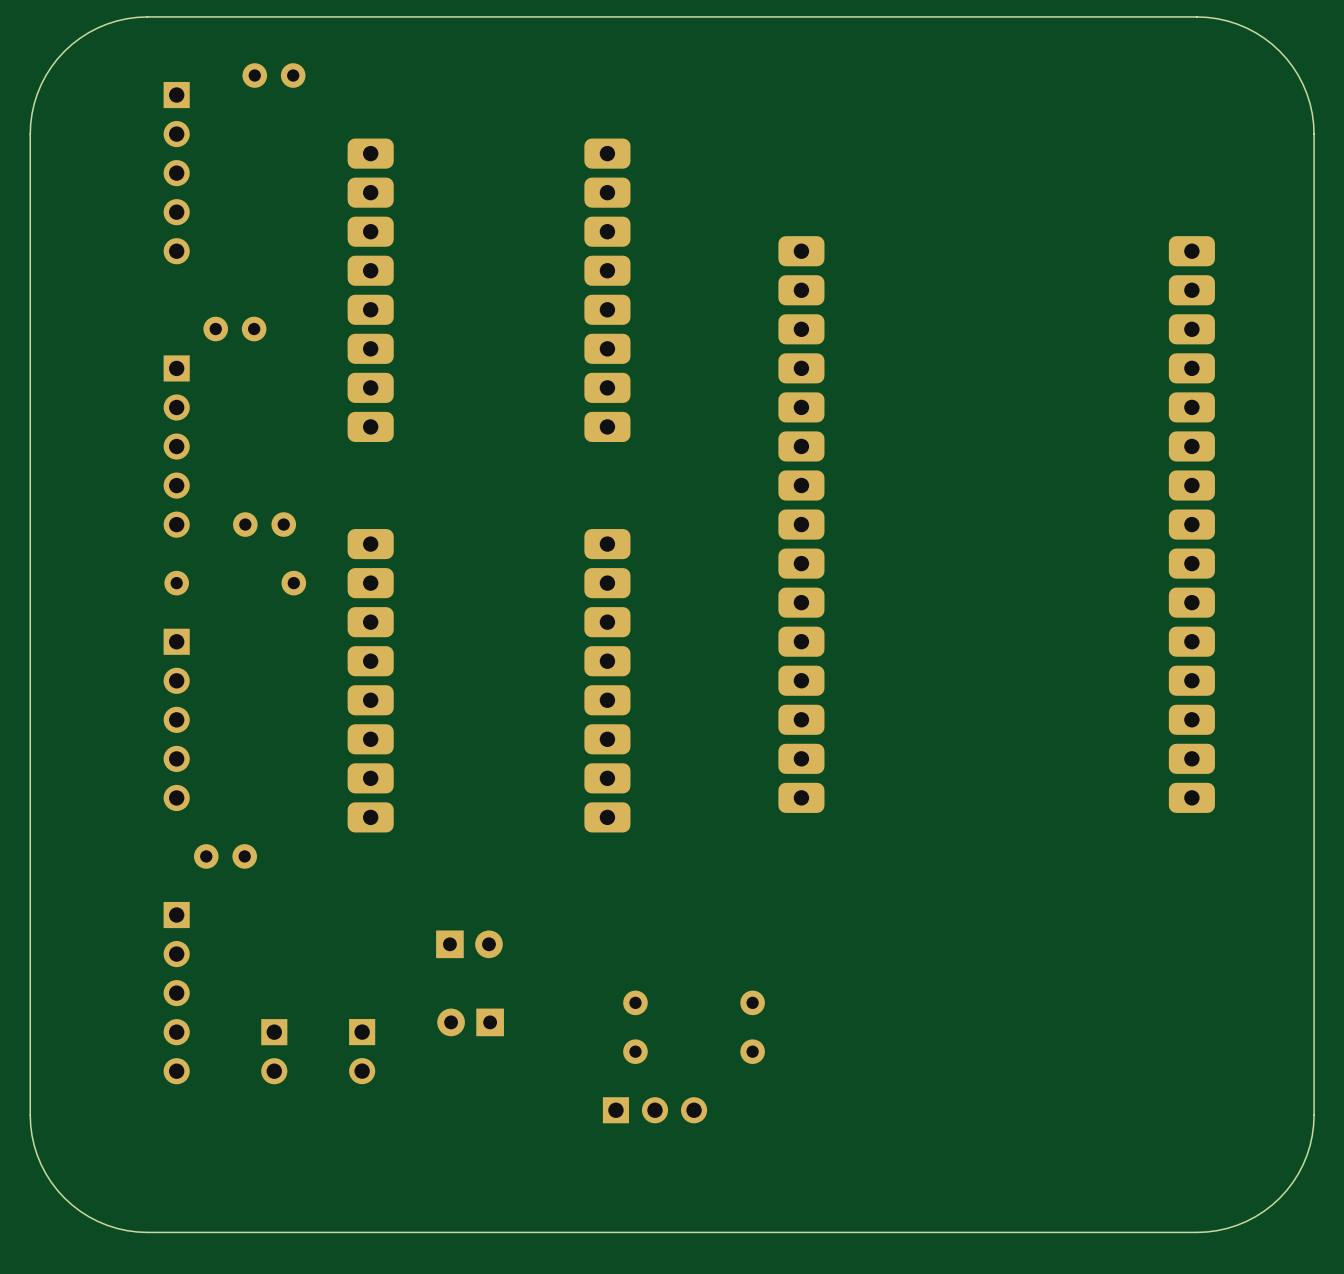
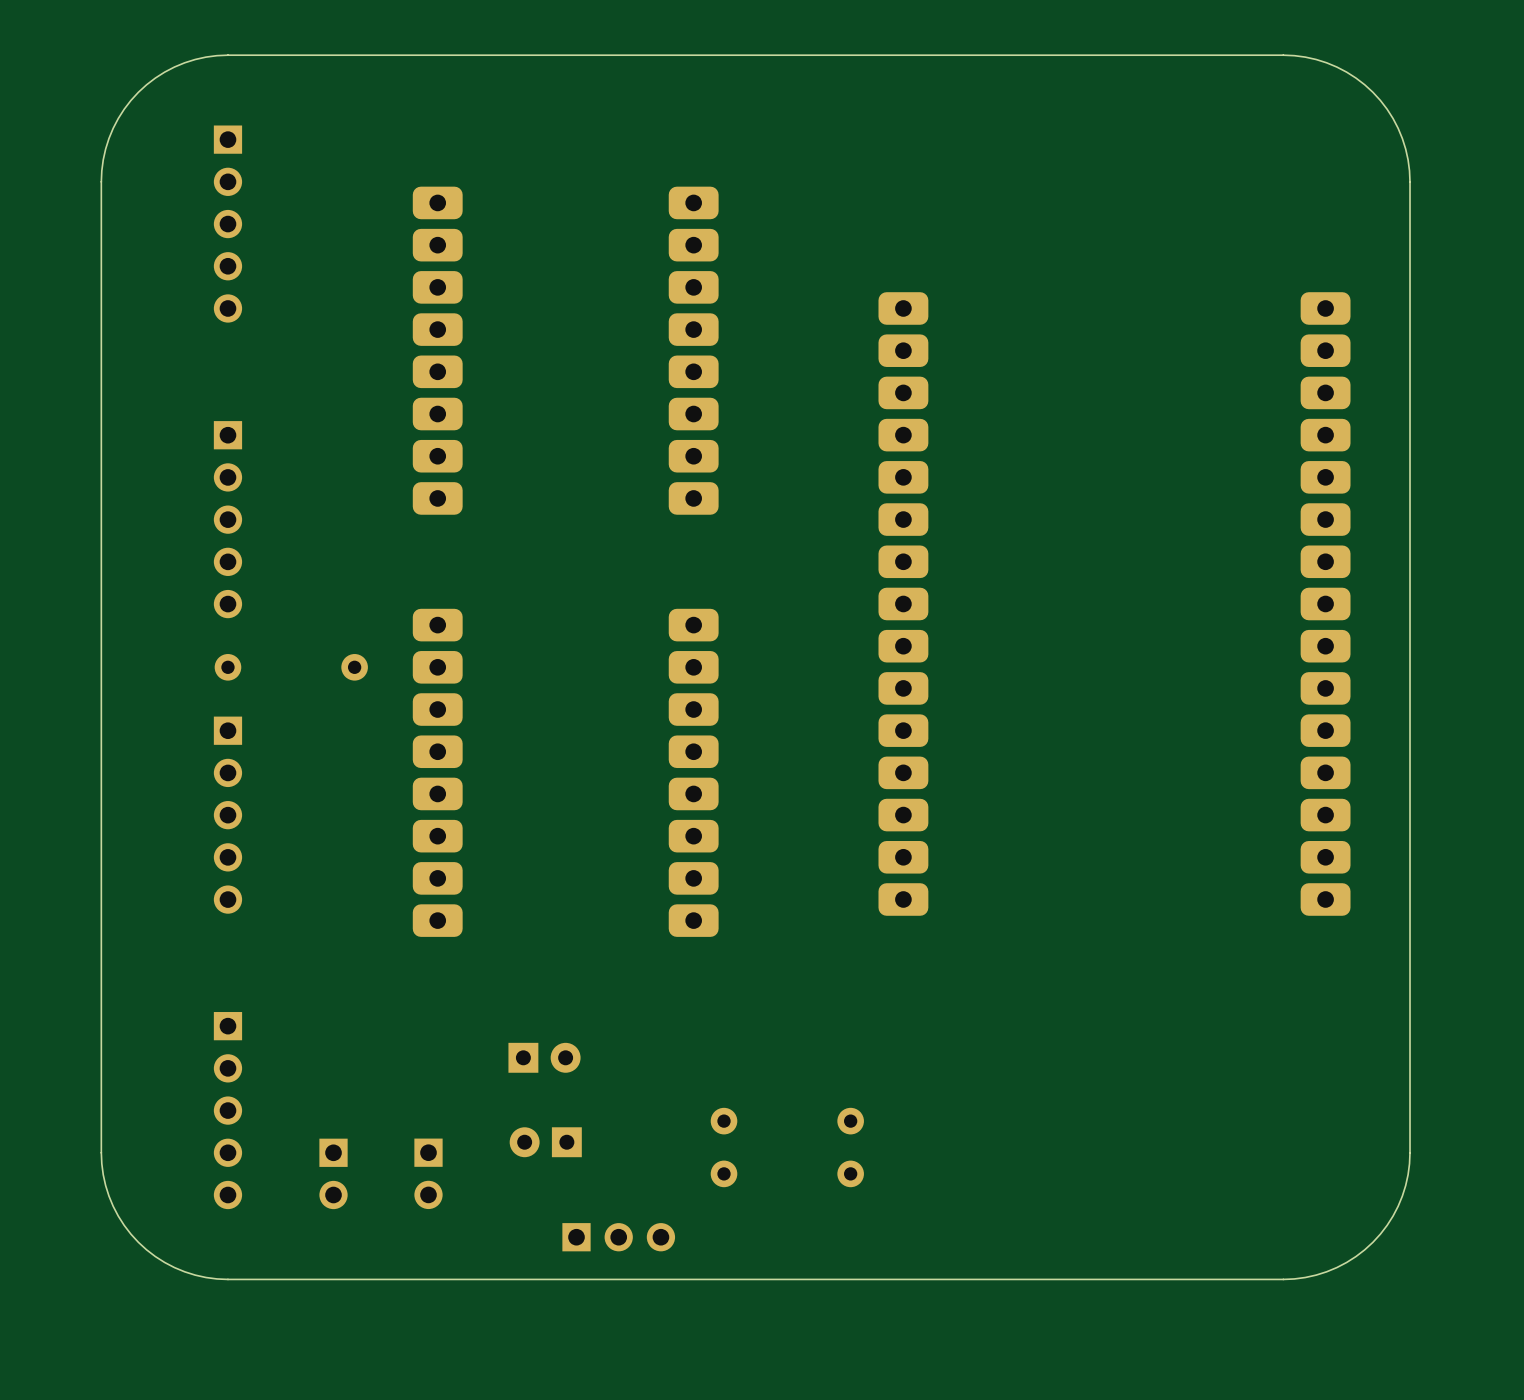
board edge: (1152, 16) (1217, 18) (1246, 27) (1264, 38) (1279, 51) (1298, 75) (1310, 103) (1314, 134) (1313, 1125) (1310, 1145) (1298, 1173) (1286, 1190) (1272, 1205) (1255, 1216) (1236, 1225) (1217, 1230) (1196, 1232) (147, 1232) (127, 1230) (97, 1221) (80, 1211) (57, 1190) (45, 1173) (37, 1155) (32, 1135) (30, 1115) (30, 123) (34, 103) (45, 75) (64, 51) (80, 38) (97, 27) (127, 18) (176, 16) -> (1283, 55) (1305, 57) (1326, 62) (1356, 78) (1372, 92) (1387, 109) (1398, 128) (1405, 149) (1410, 181) (1409, 1163) (1405, 1185) (1393, 1216) (1380, 1234) (1364, 1249) (1346, 1262) (1326, 1271) (1305, 1277) (1283, 1279) (227, 1279) (205, 1277) (174, 1267) (146, 1249) (130, 1234) (118, 1216) (108, 1196) (103, 1174) (101, 1152) (101, 170) (108, 138) (118, 118) (130, 100) (146, 84) (164, 72) (184, 62) (205, 57) (227, 55)
part: (273, 75) -> none
part: (234, 329) -> none
part: (264, 524) -> none
part: (225, 856) -> none
part position: (655, 1110) -> (618, 1237)

